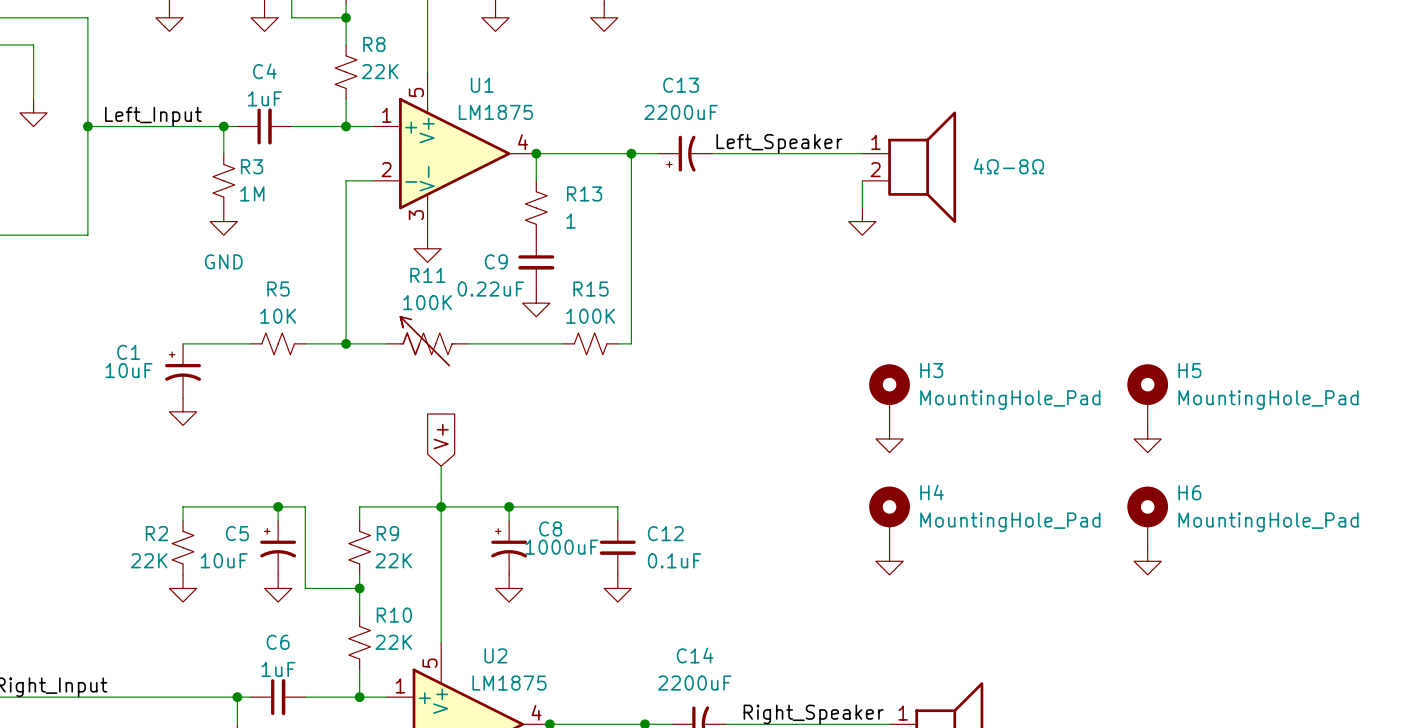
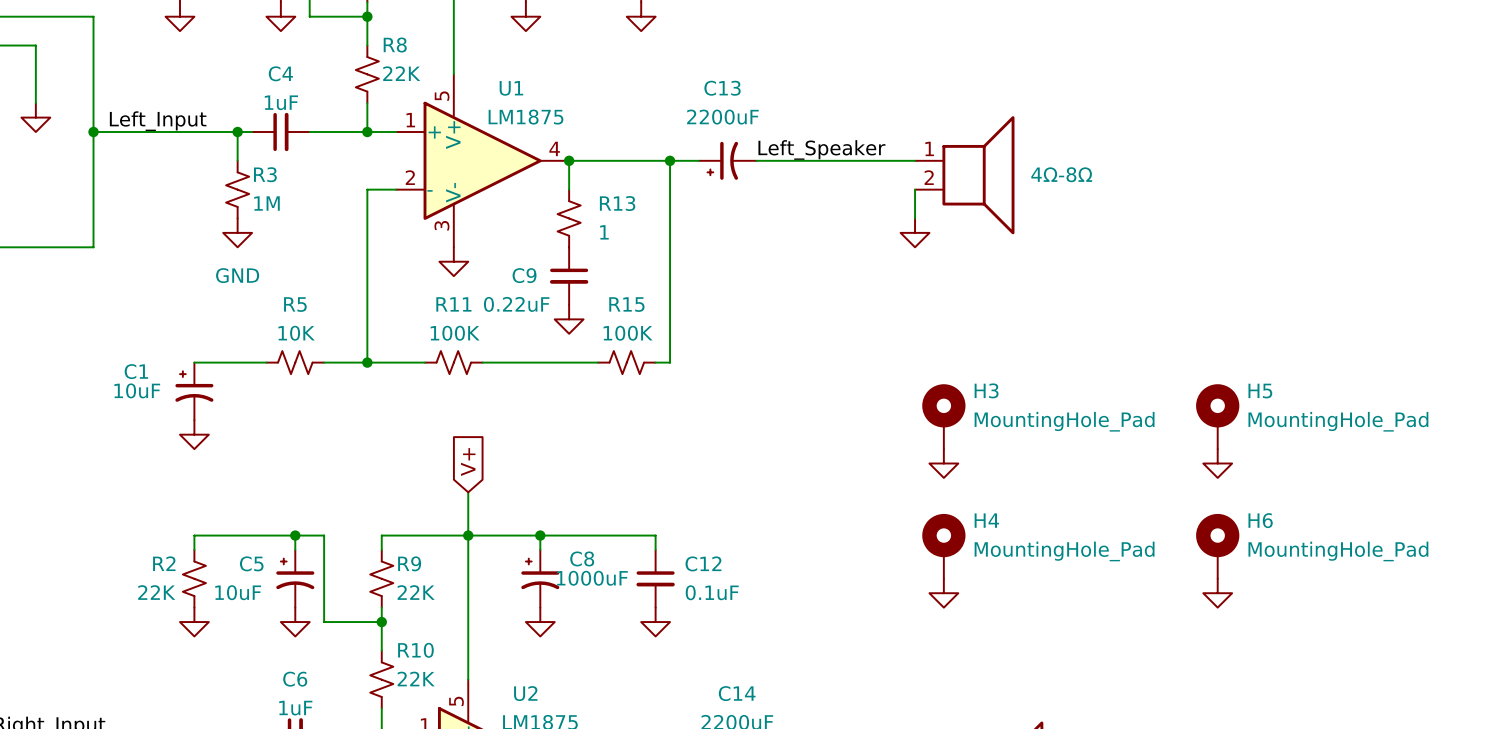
R11 symbol: [386, 315, 469, 367] -> [425, 351, 483, 375]

